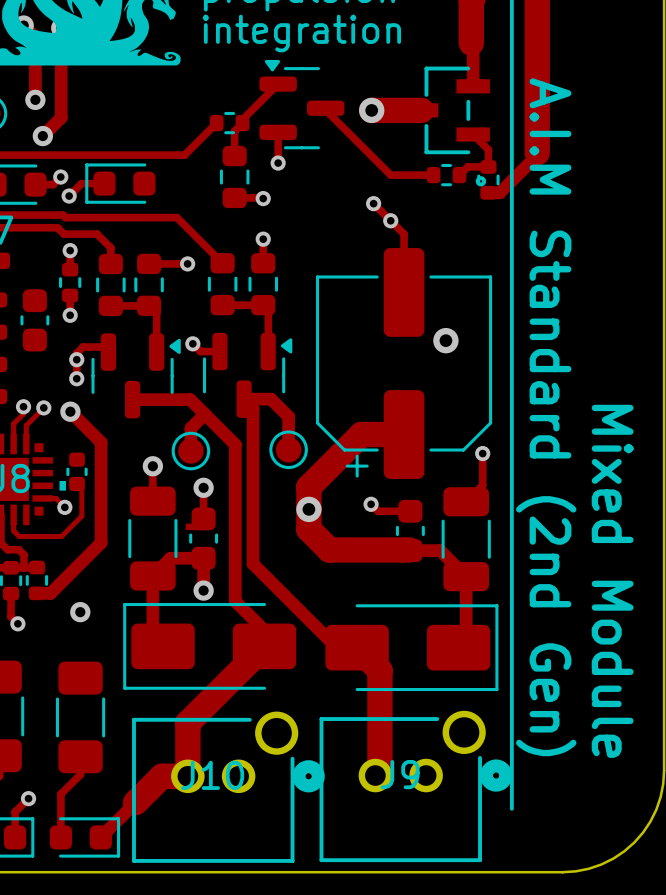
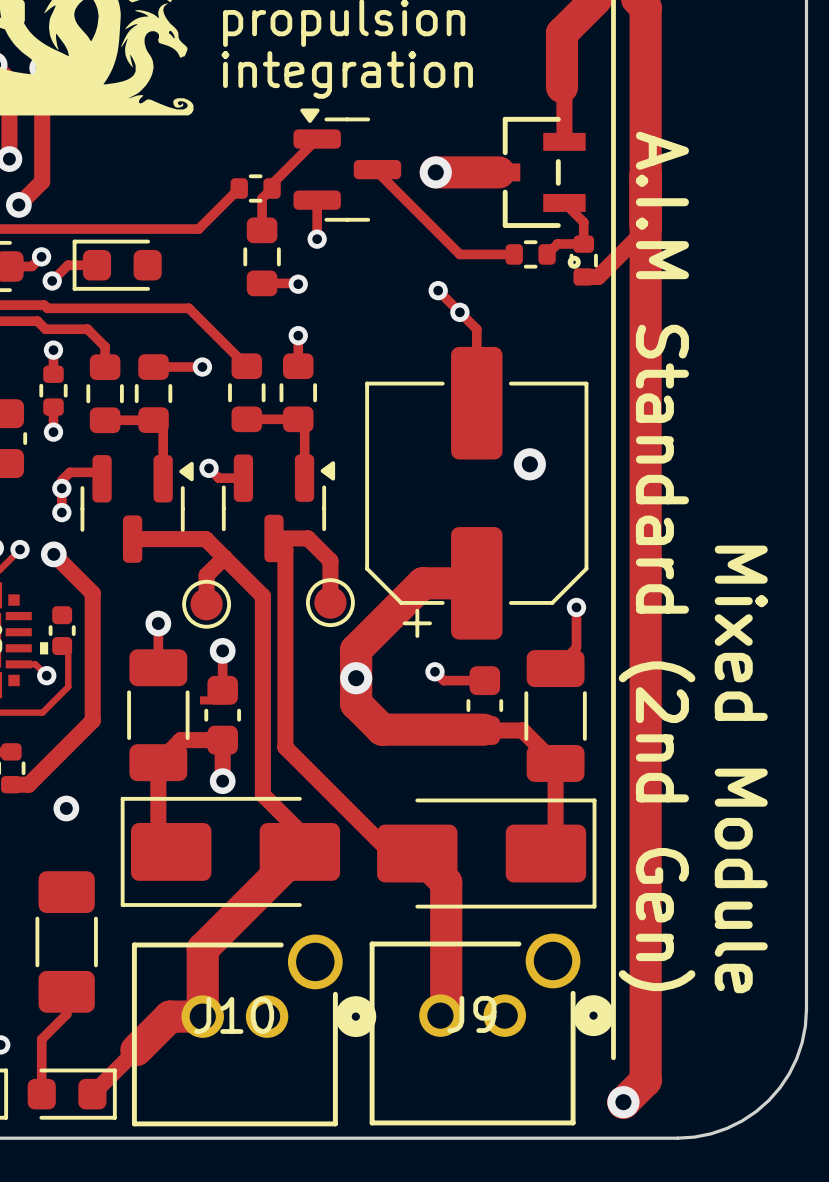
track: none -> (645, 226) (645, 1080) (624, 1102)
via: none -> (623, 1102)

